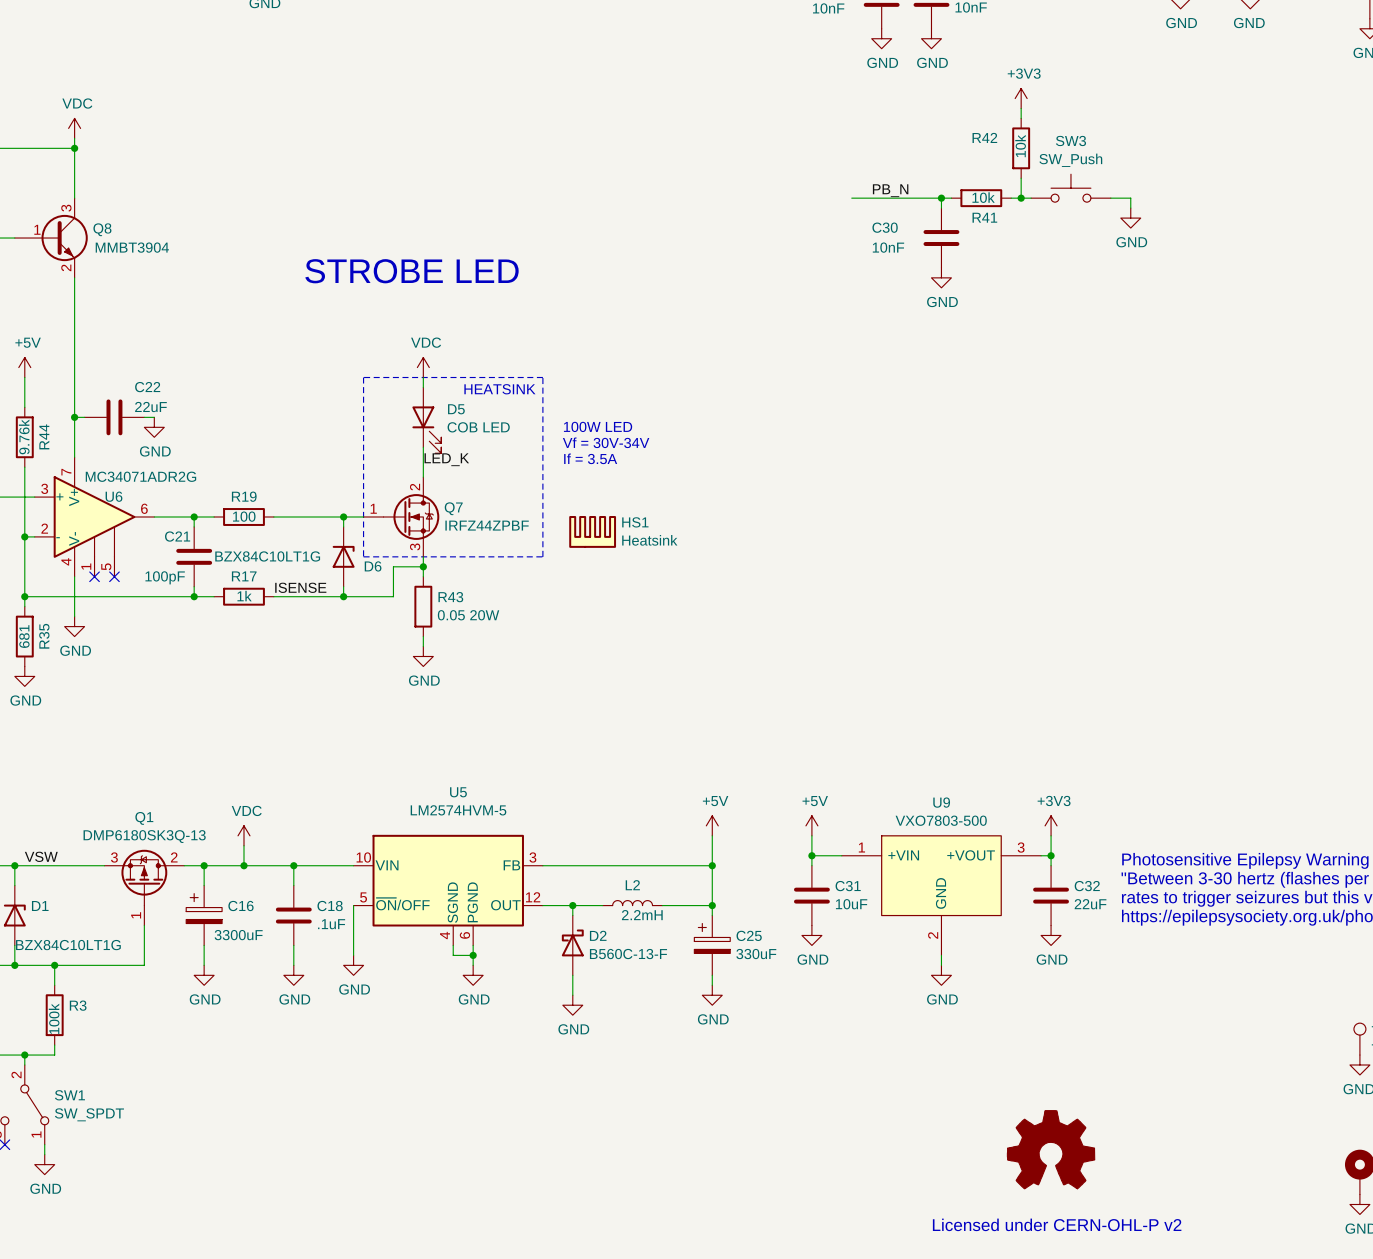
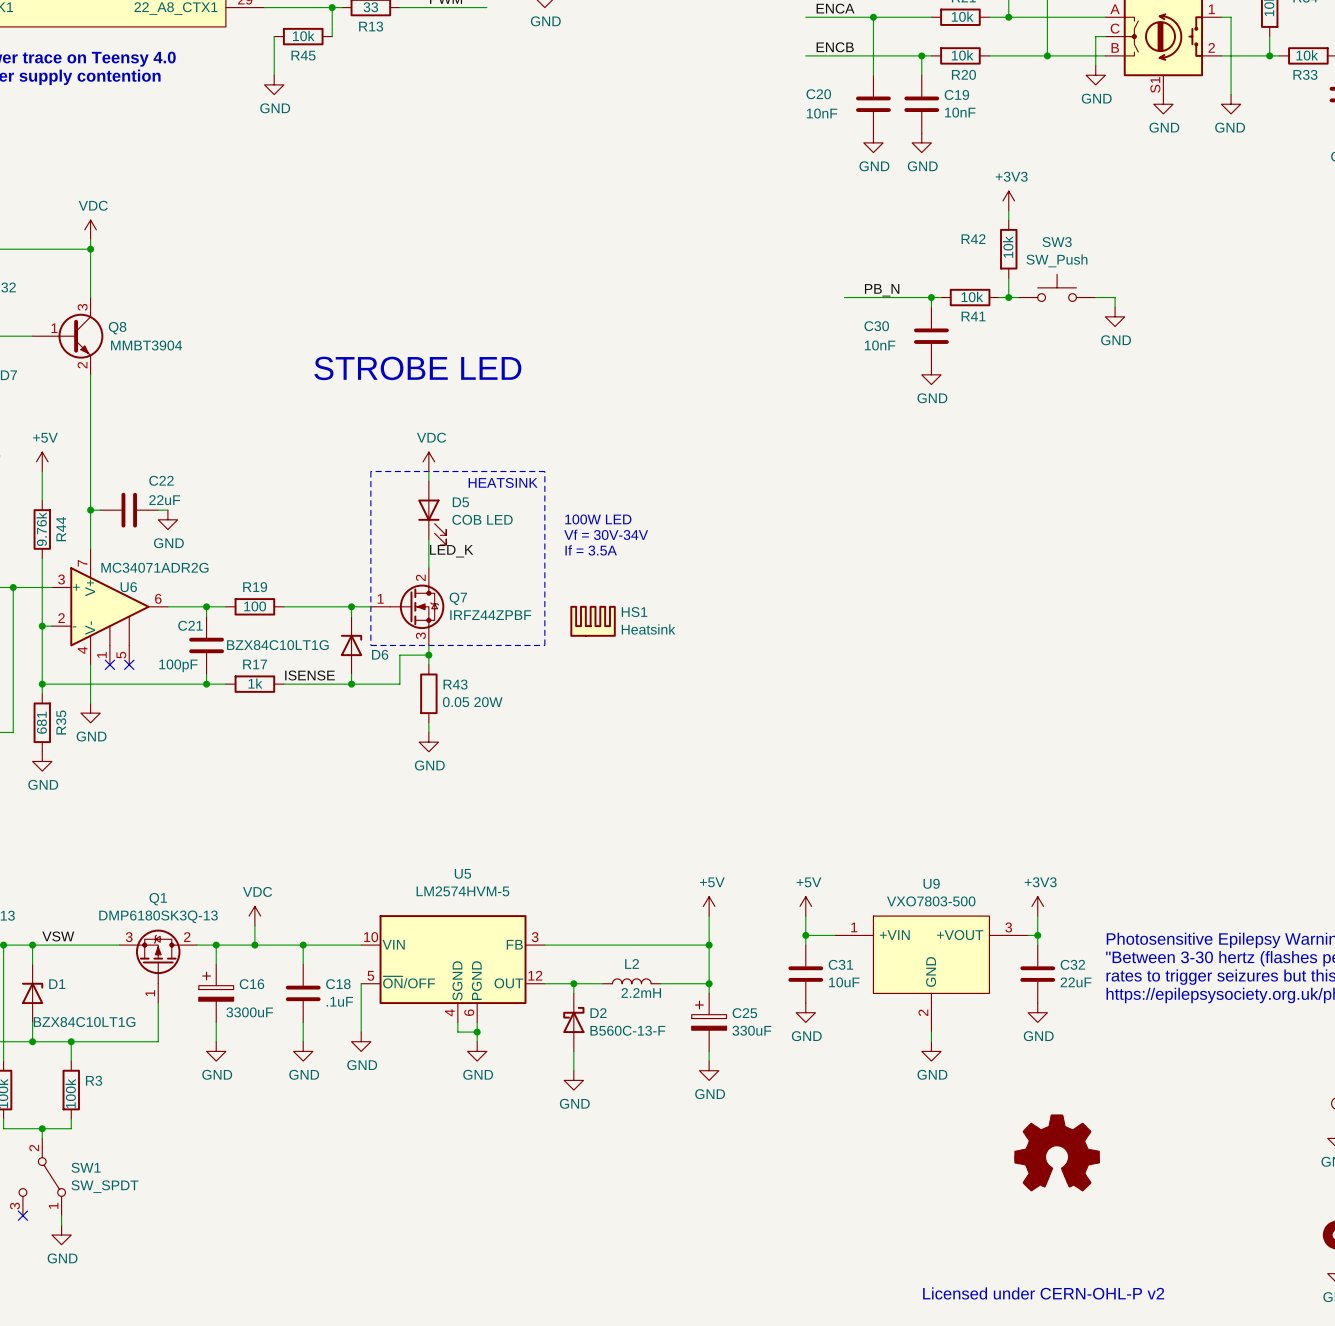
power symbol: none -> (1057, 1152)
part: (1051, 1149) -> none

